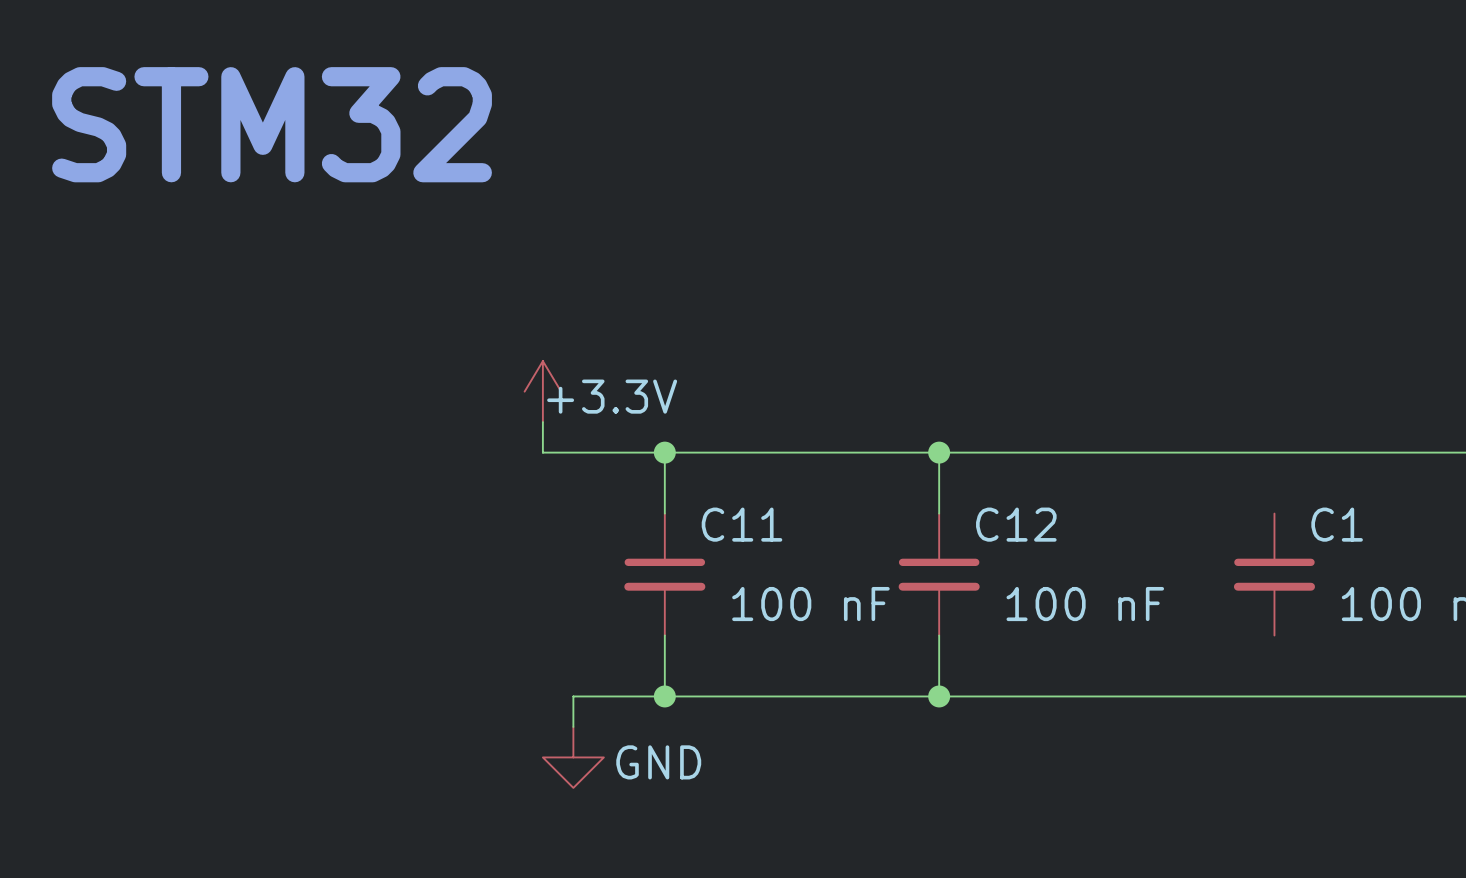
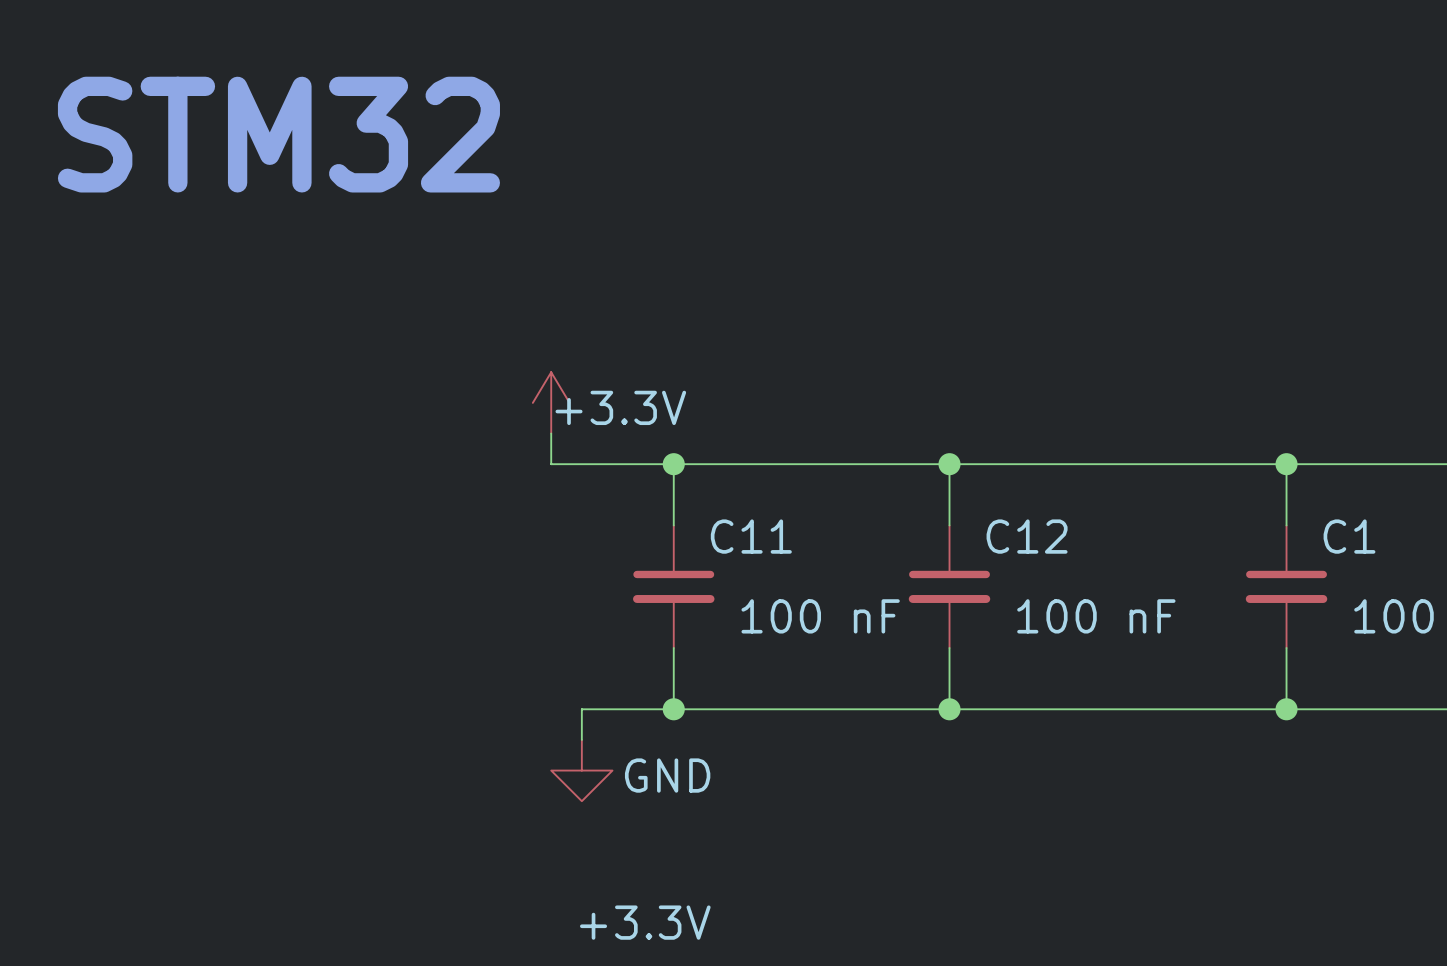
wire: none -> (1286, 464) (1286, 525)
junction: none -> (1286, 464)
wire: none -> (1286, 648) (1286, 709)
junction: none -> (1286, 709)

